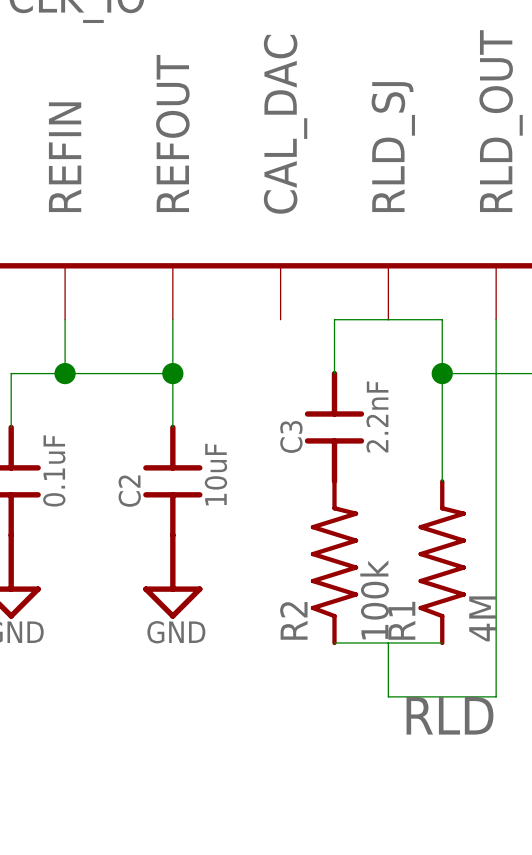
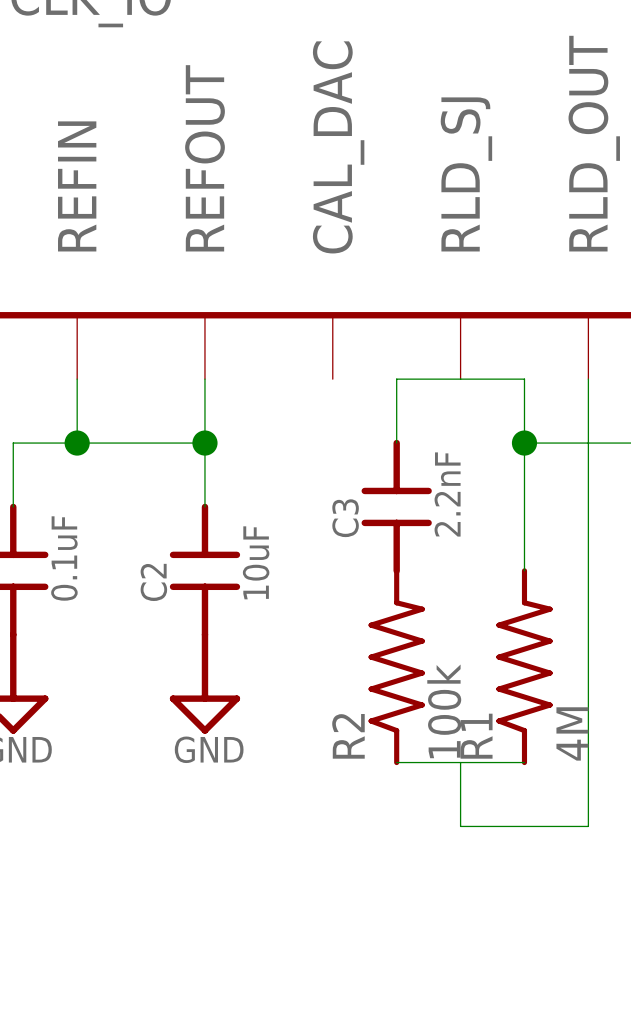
label: RLD (449, 715) -> none

